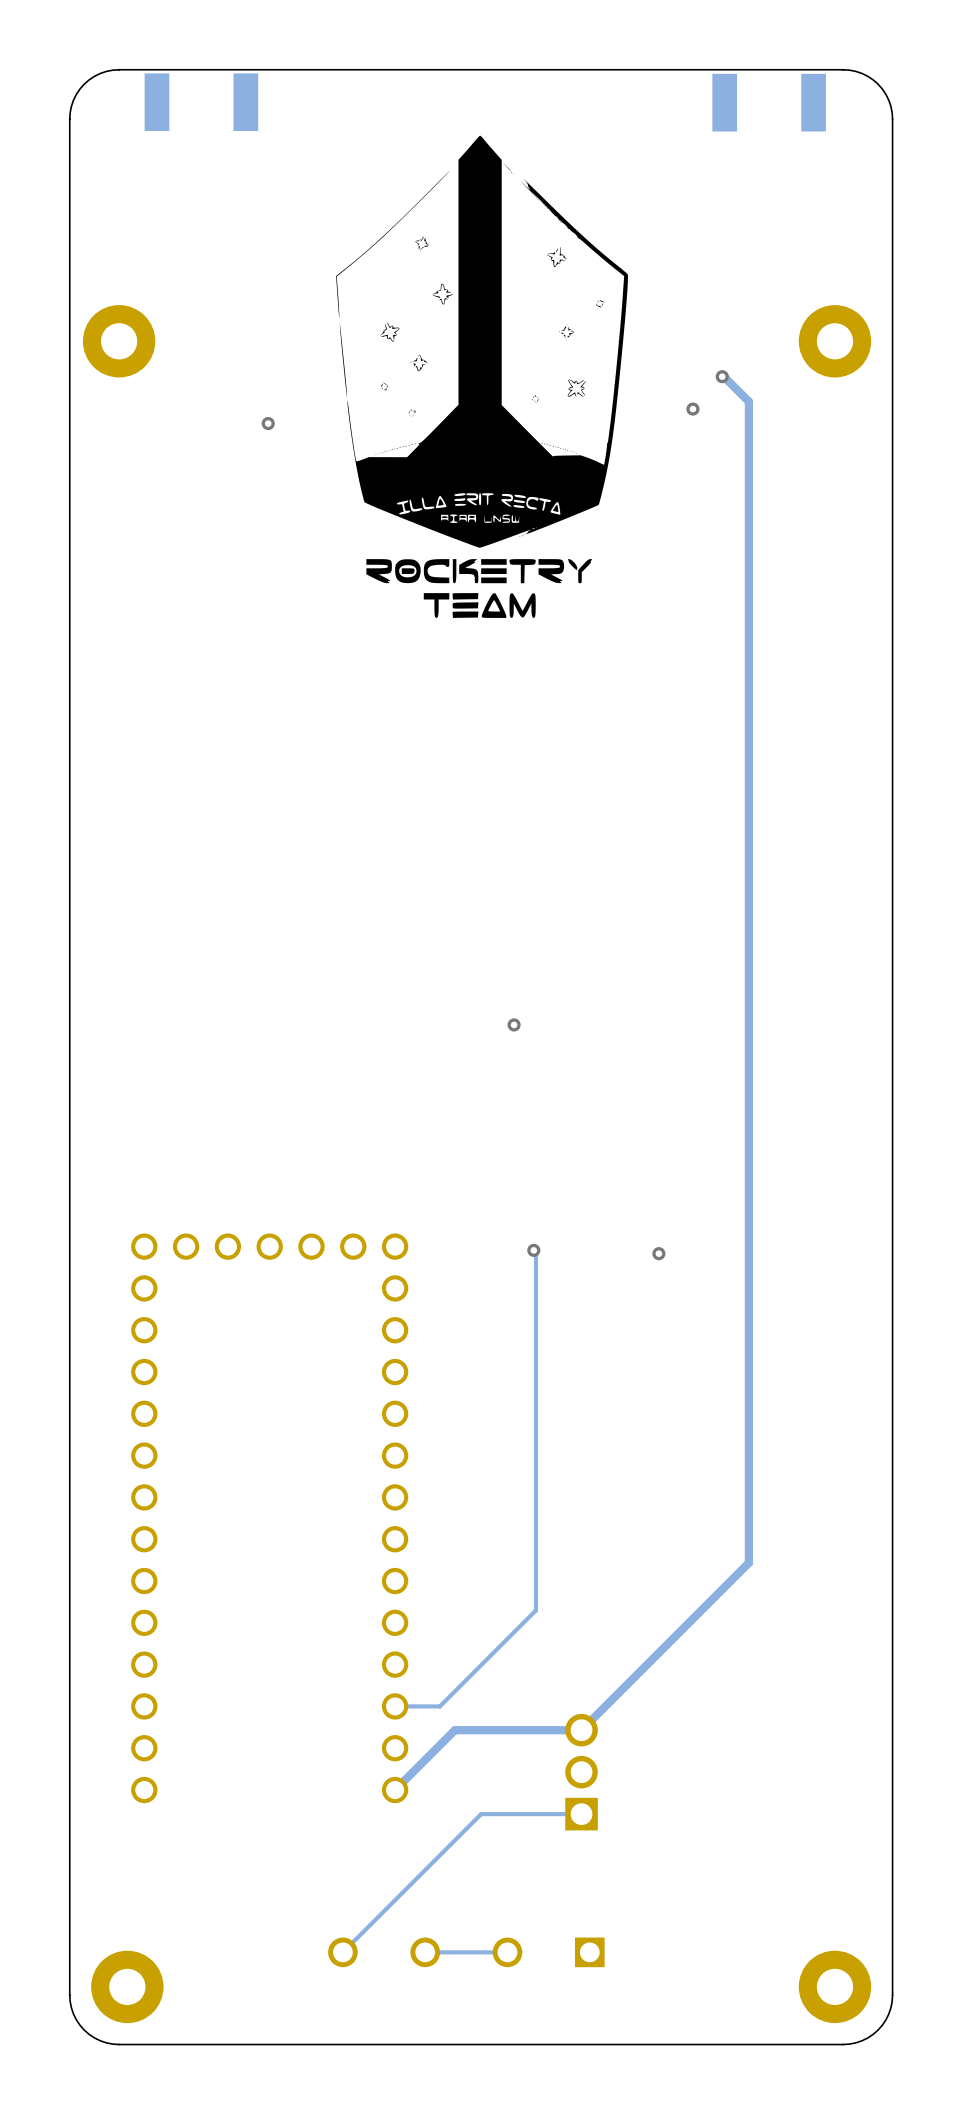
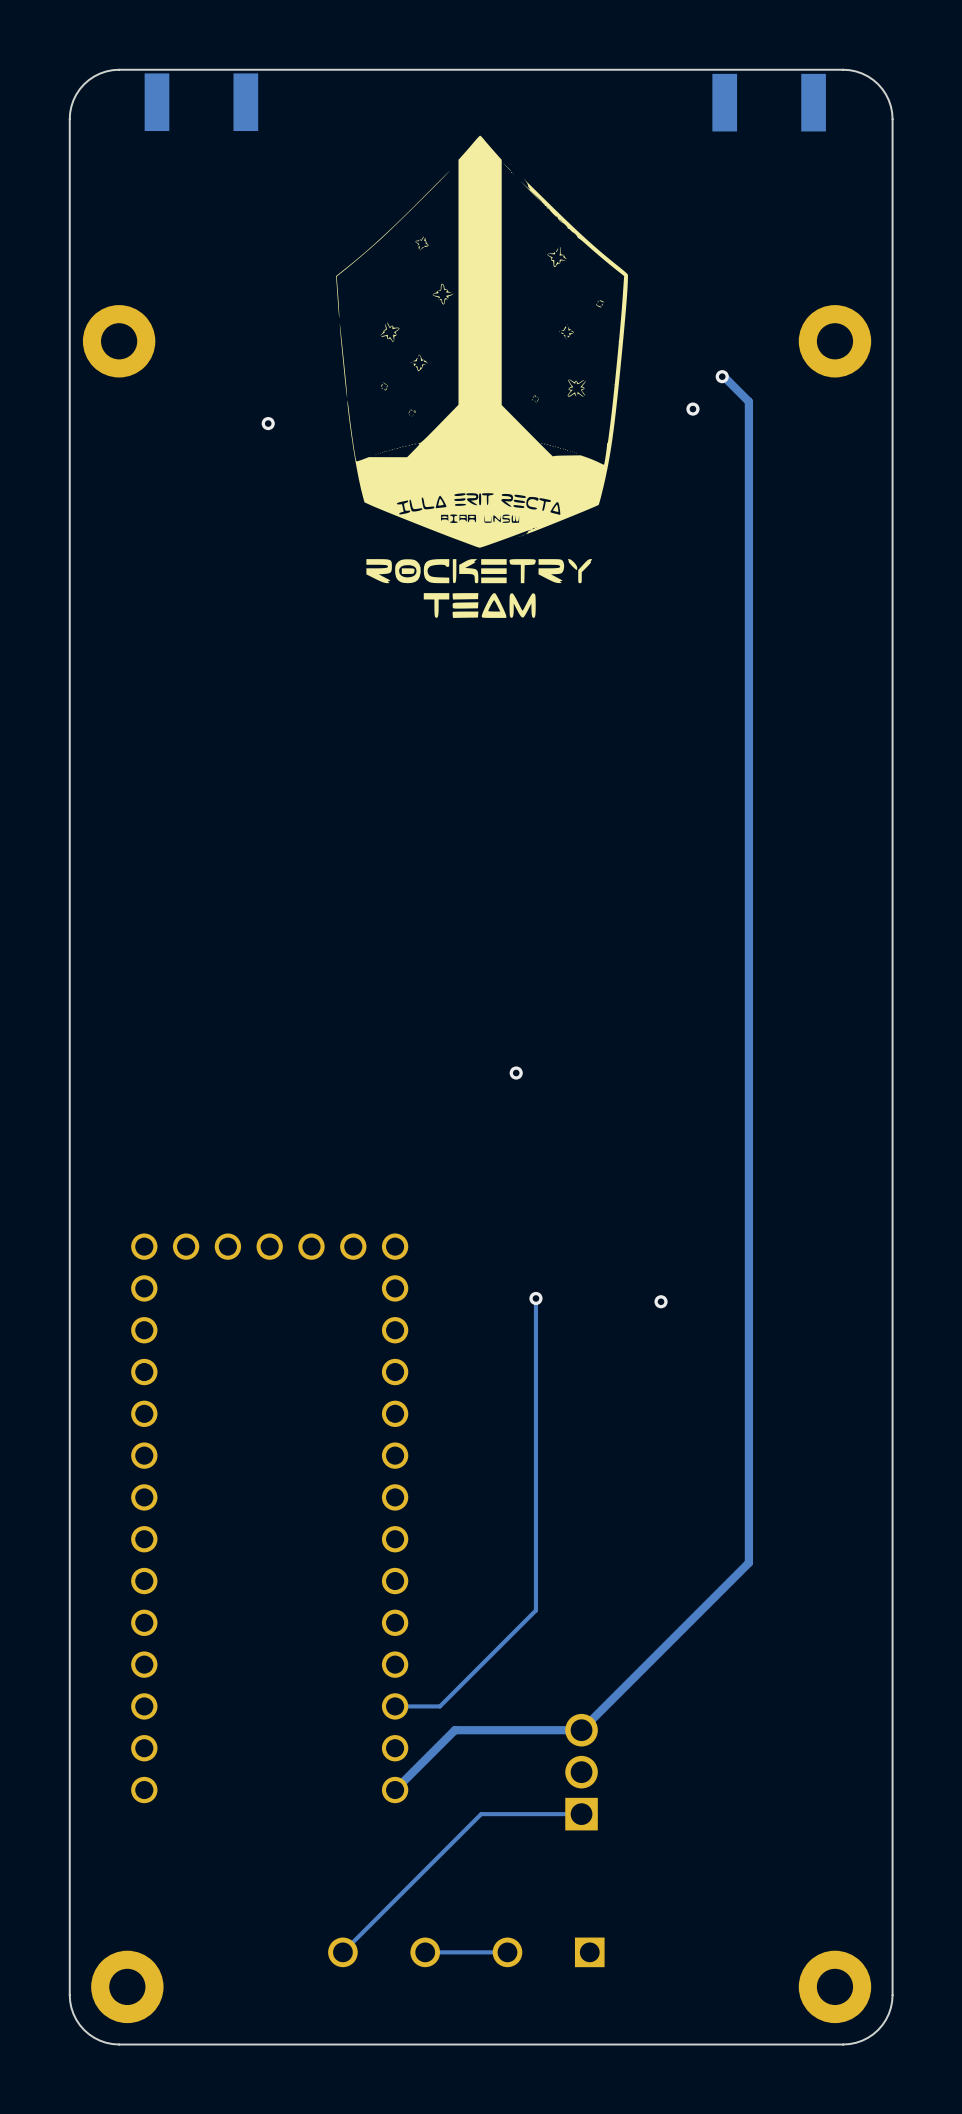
via position: (514, 1024) -> (516, 1073)
track: (533, 1250) (535, 1252) (535, 1298) -> none
via position: (533, 1250) -> (535, 1298)
via position: (658, 1253) -> (661, 1301)

